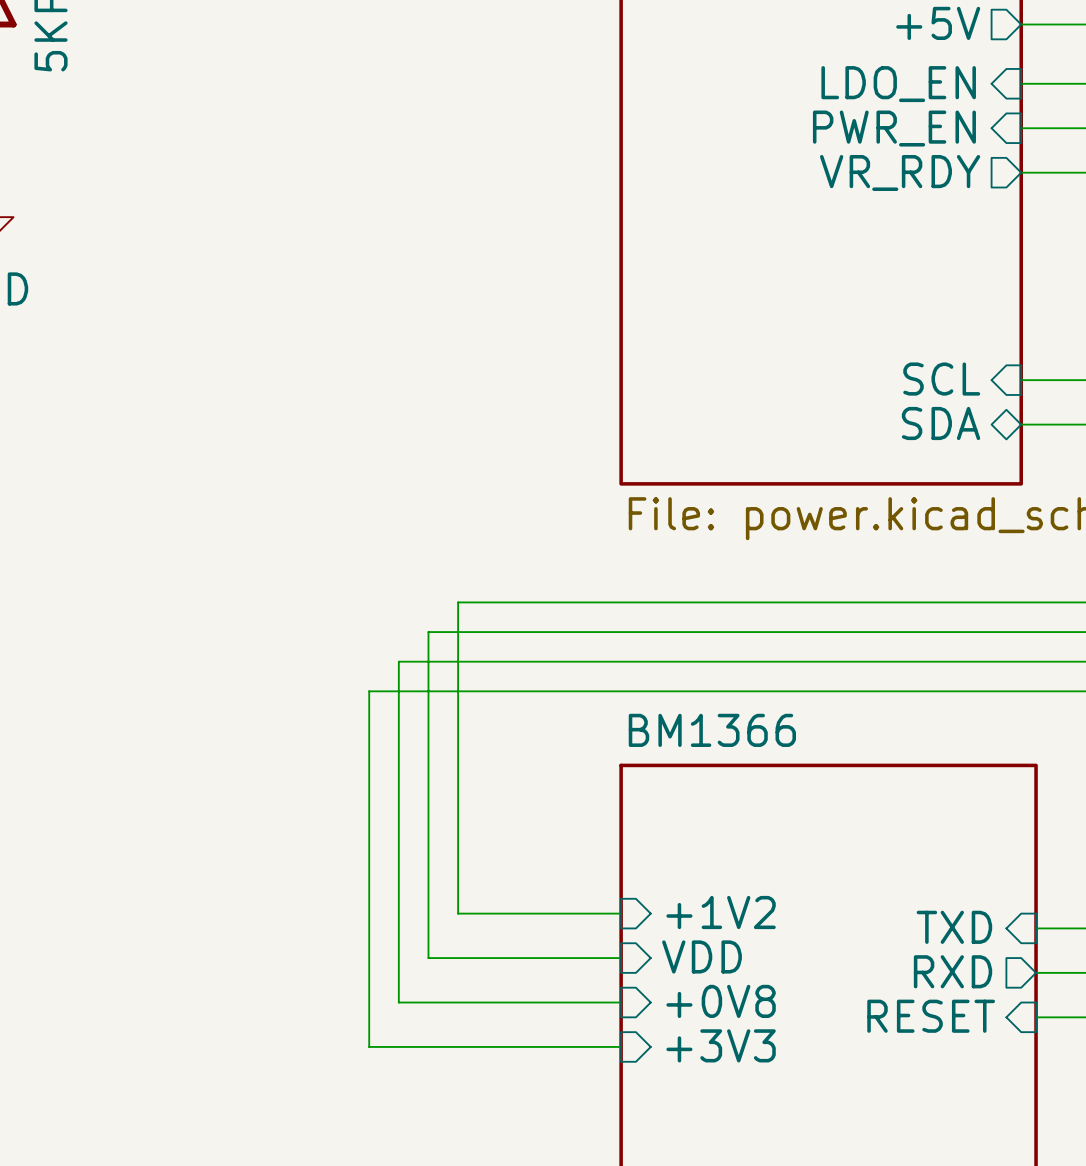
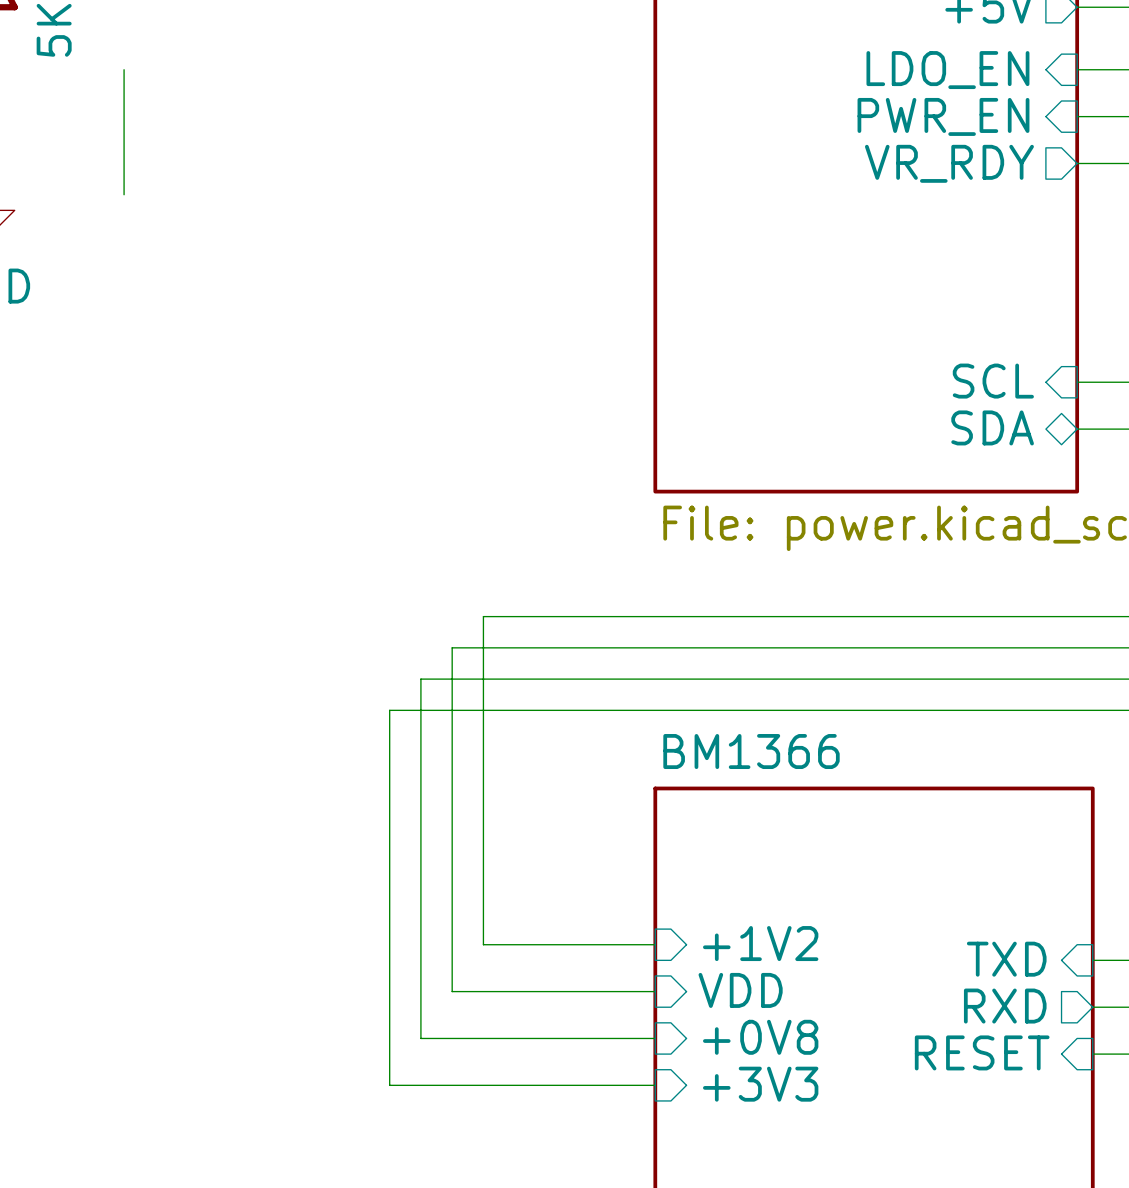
wire: none -> (124, 69) (124, 194)

